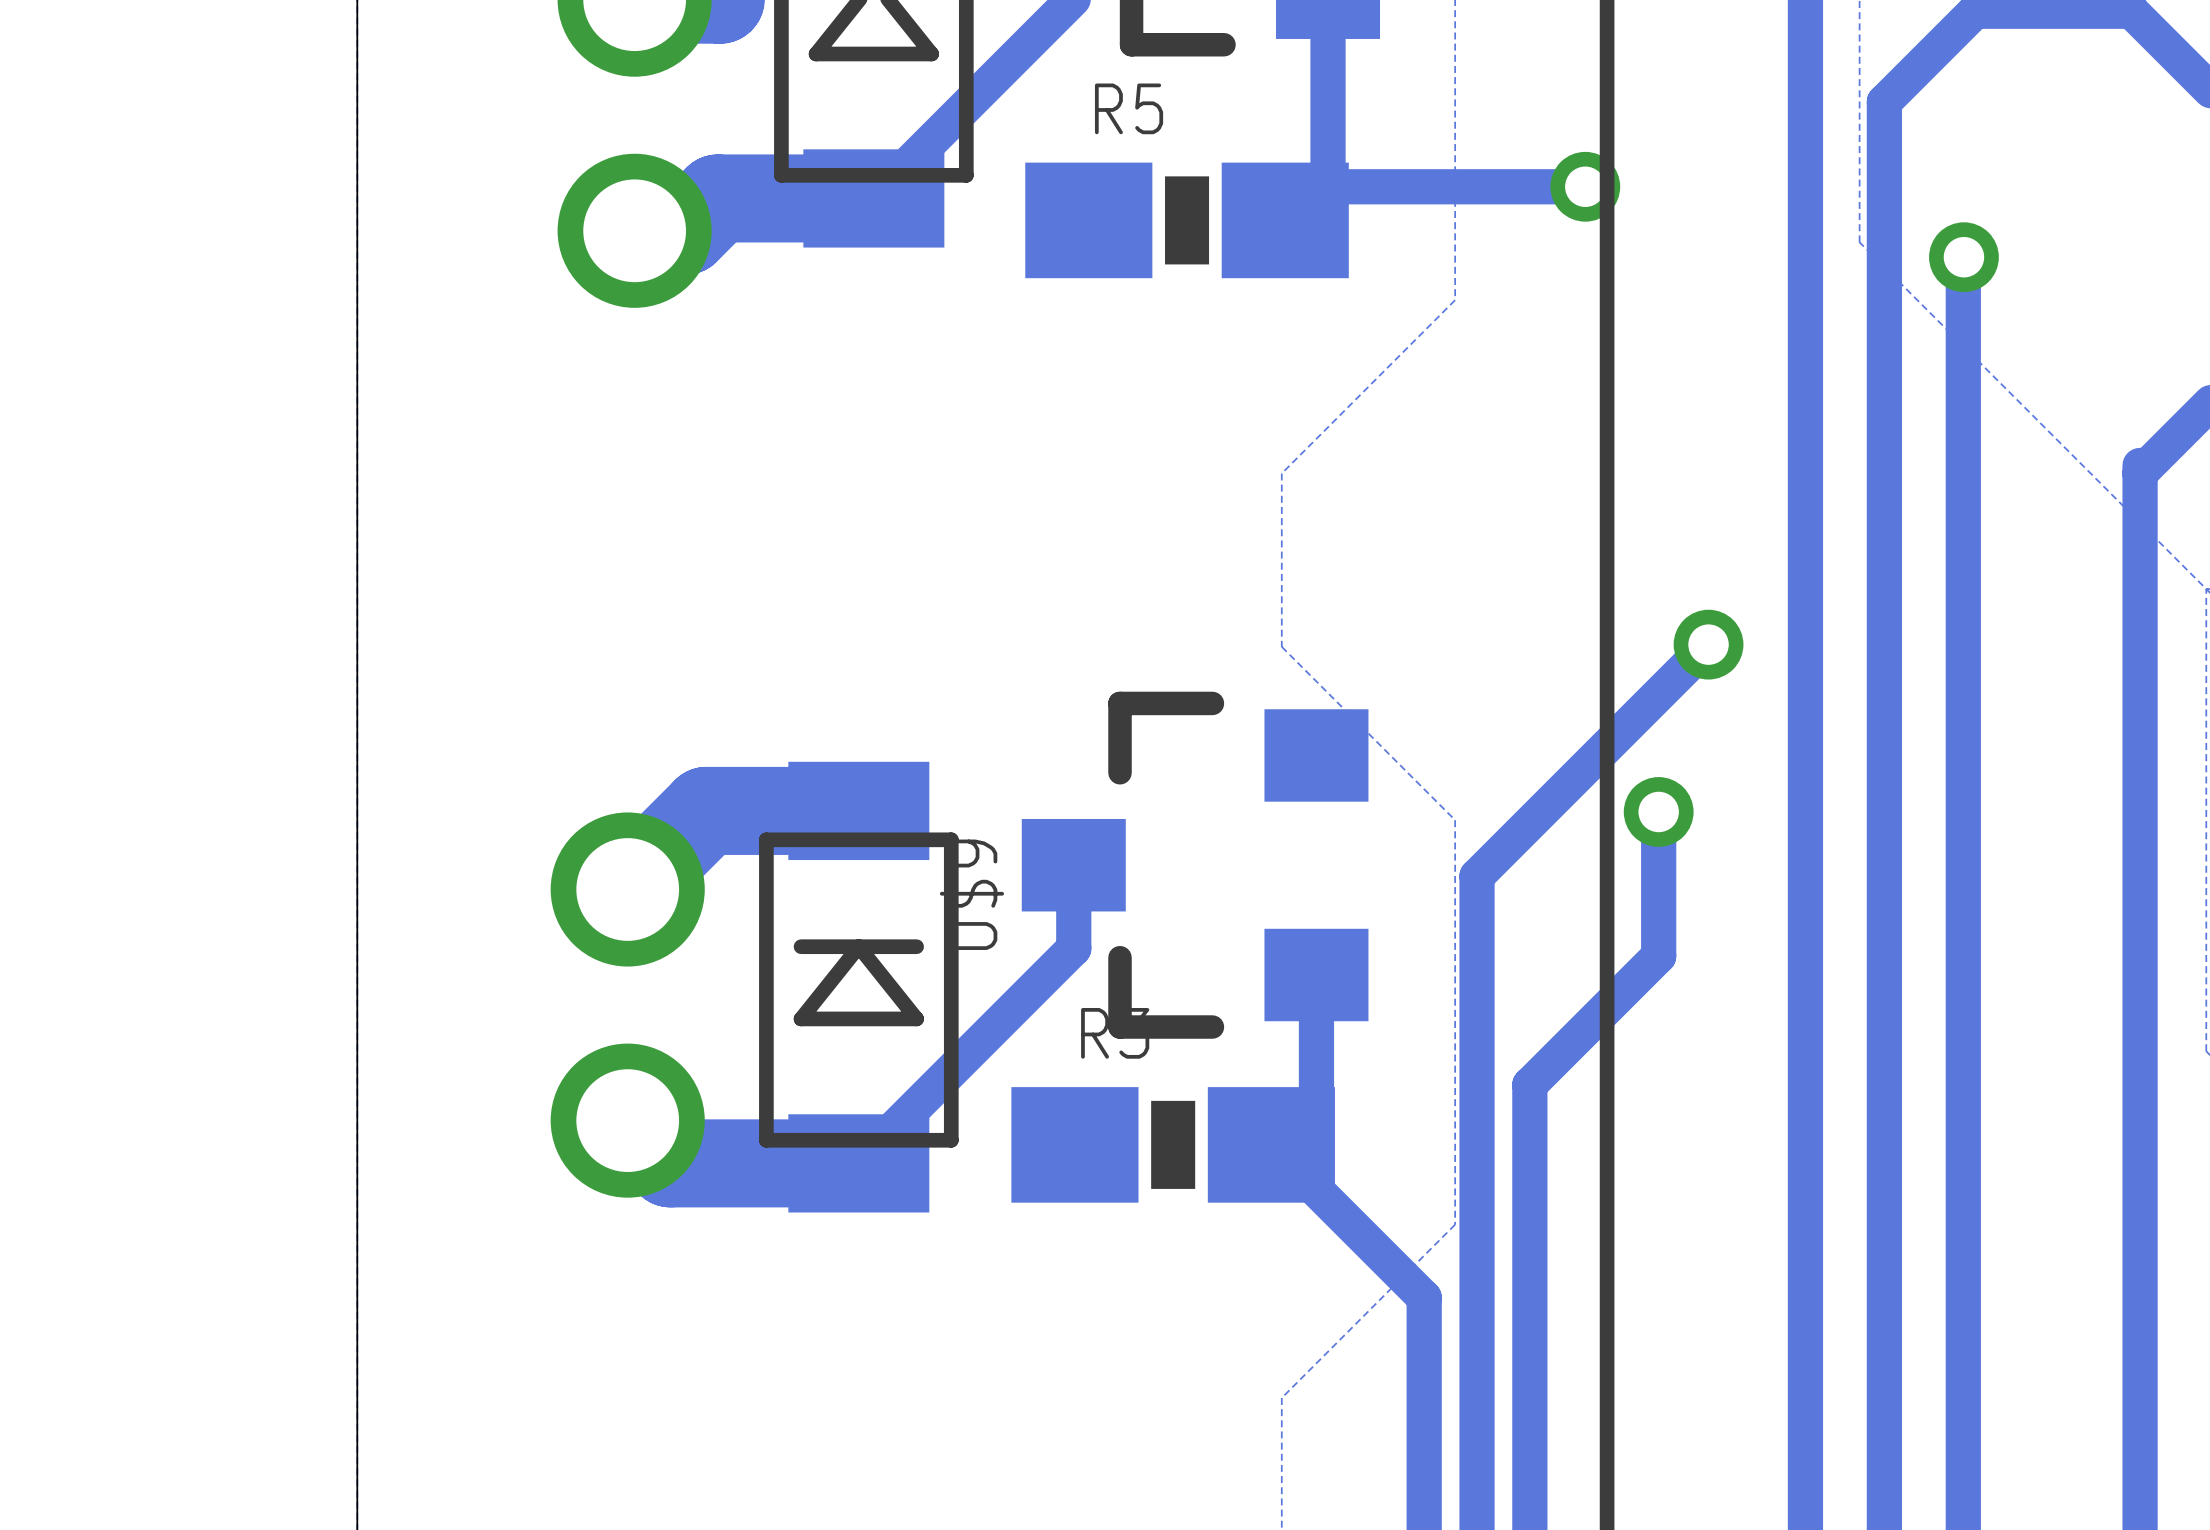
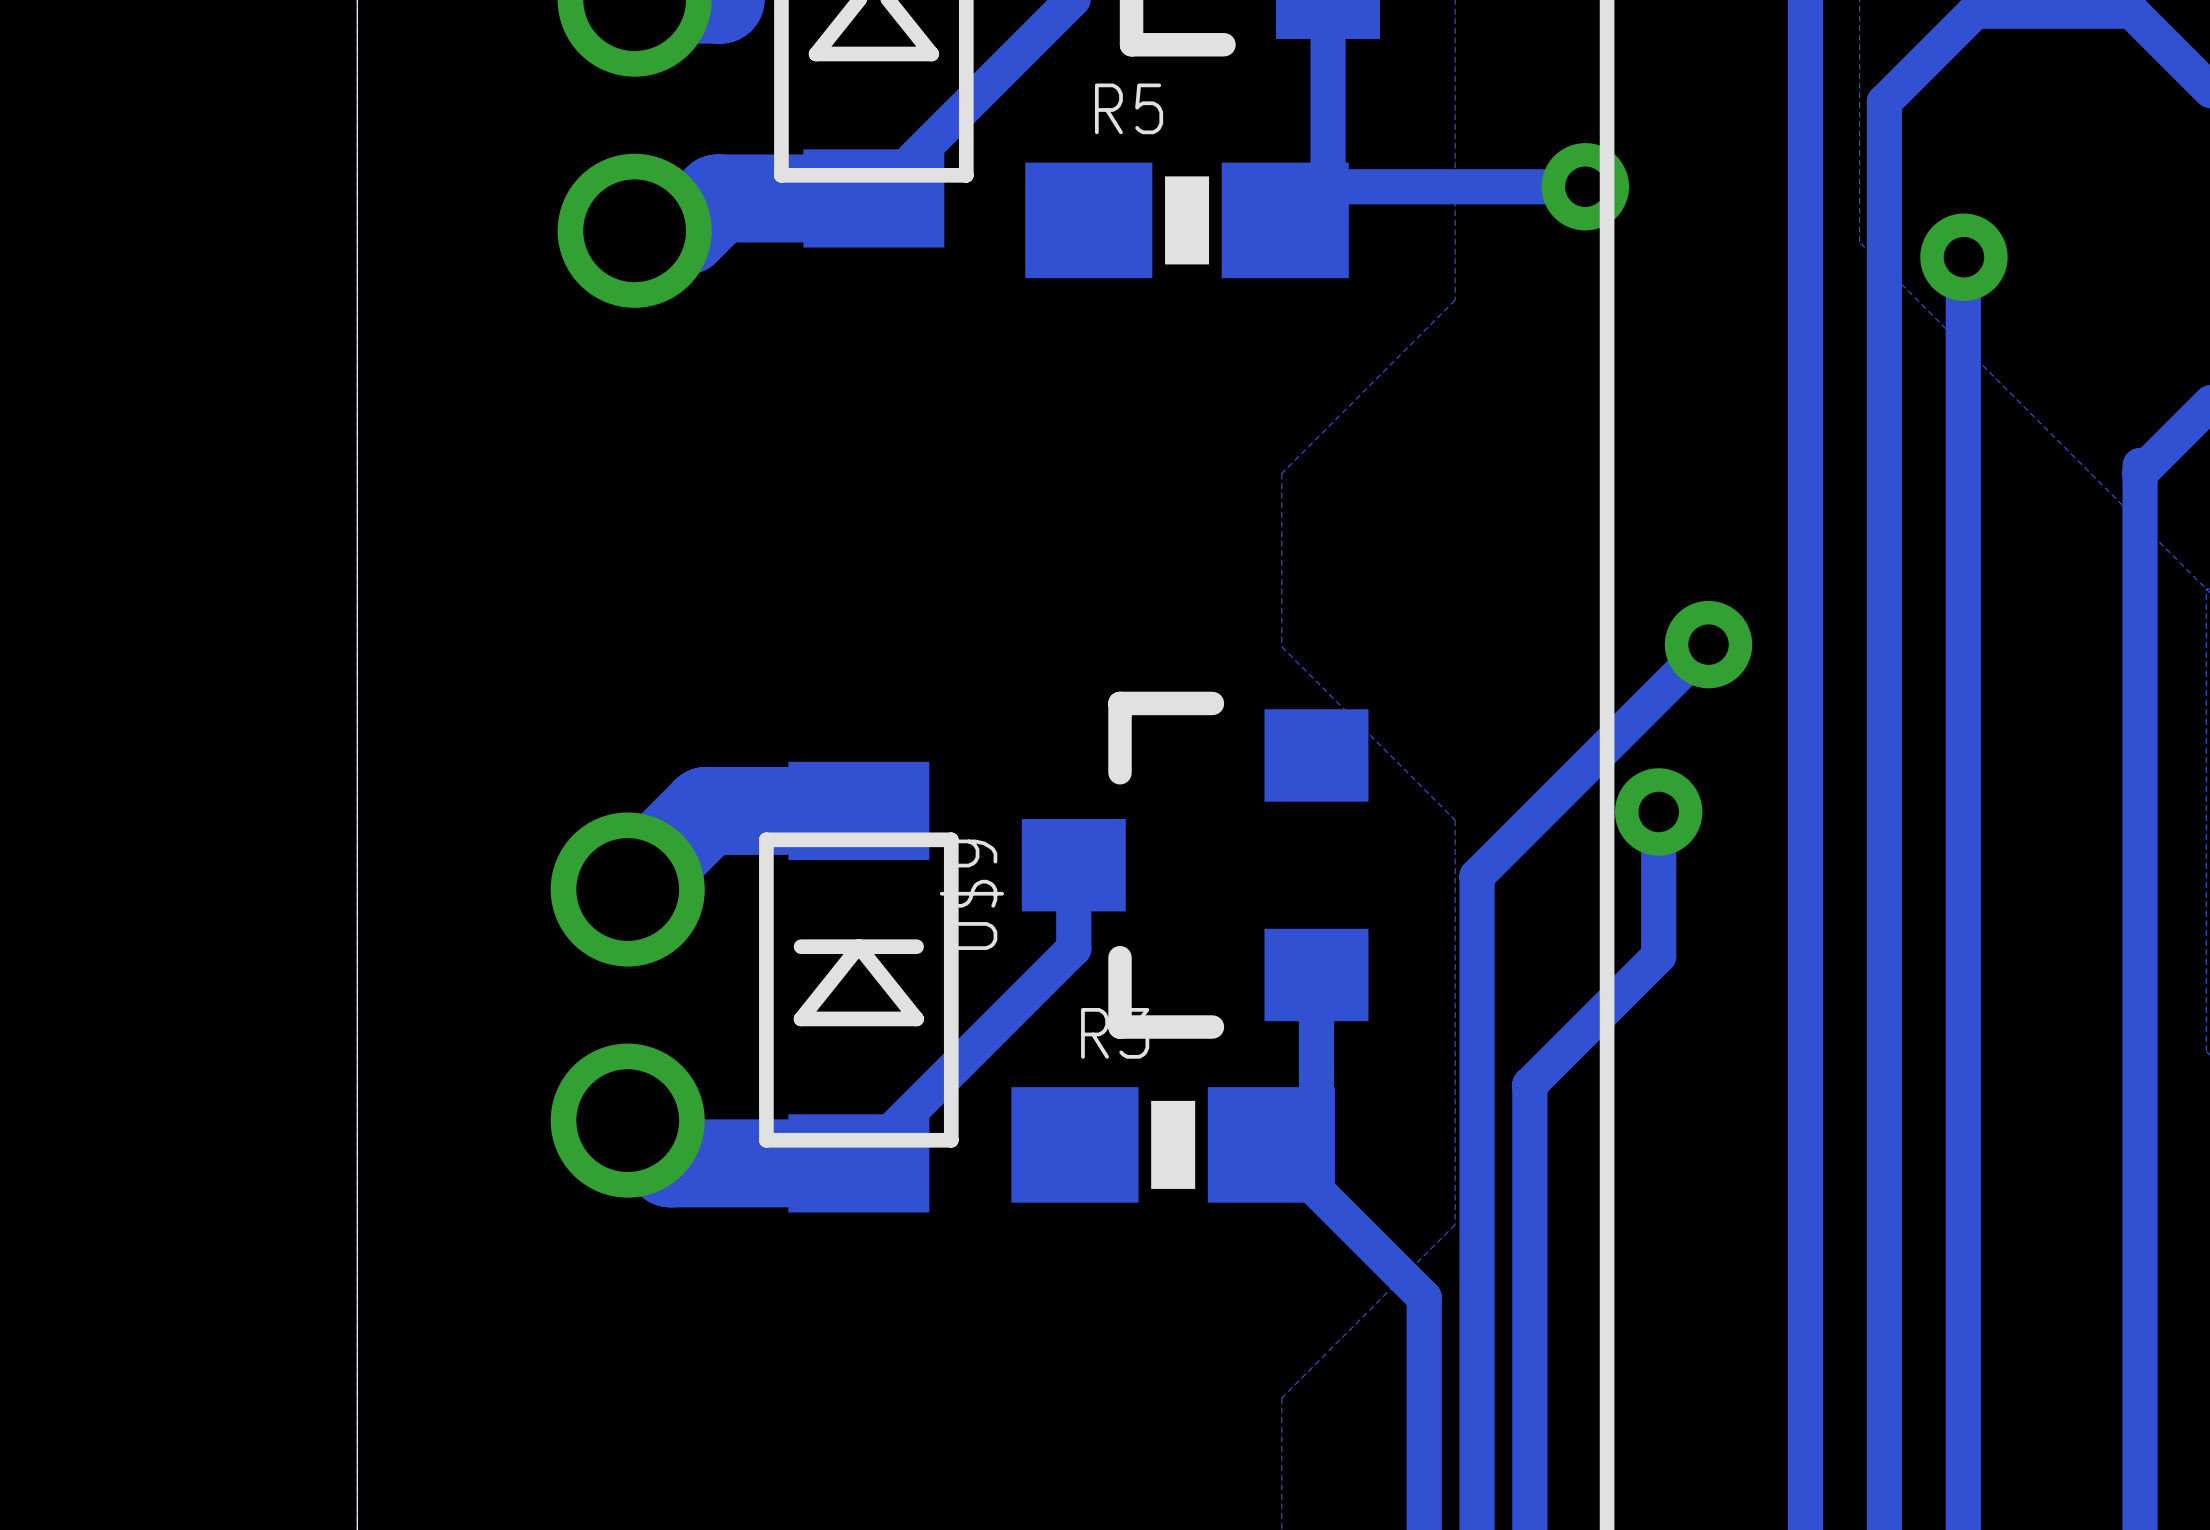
via size: [1550, 151, 1621, 222] -> [1541, 143, 1630, 231]
via size: [1929, 222, 1999, 293] -> [1920, 213, 2008, 301]
via size: [1673, 609, 1744, 680] -> [1664, 600, 1753, 689]
via size: [1623, 777, 1694, 847] -> [1614, 768, 1703, 856]

